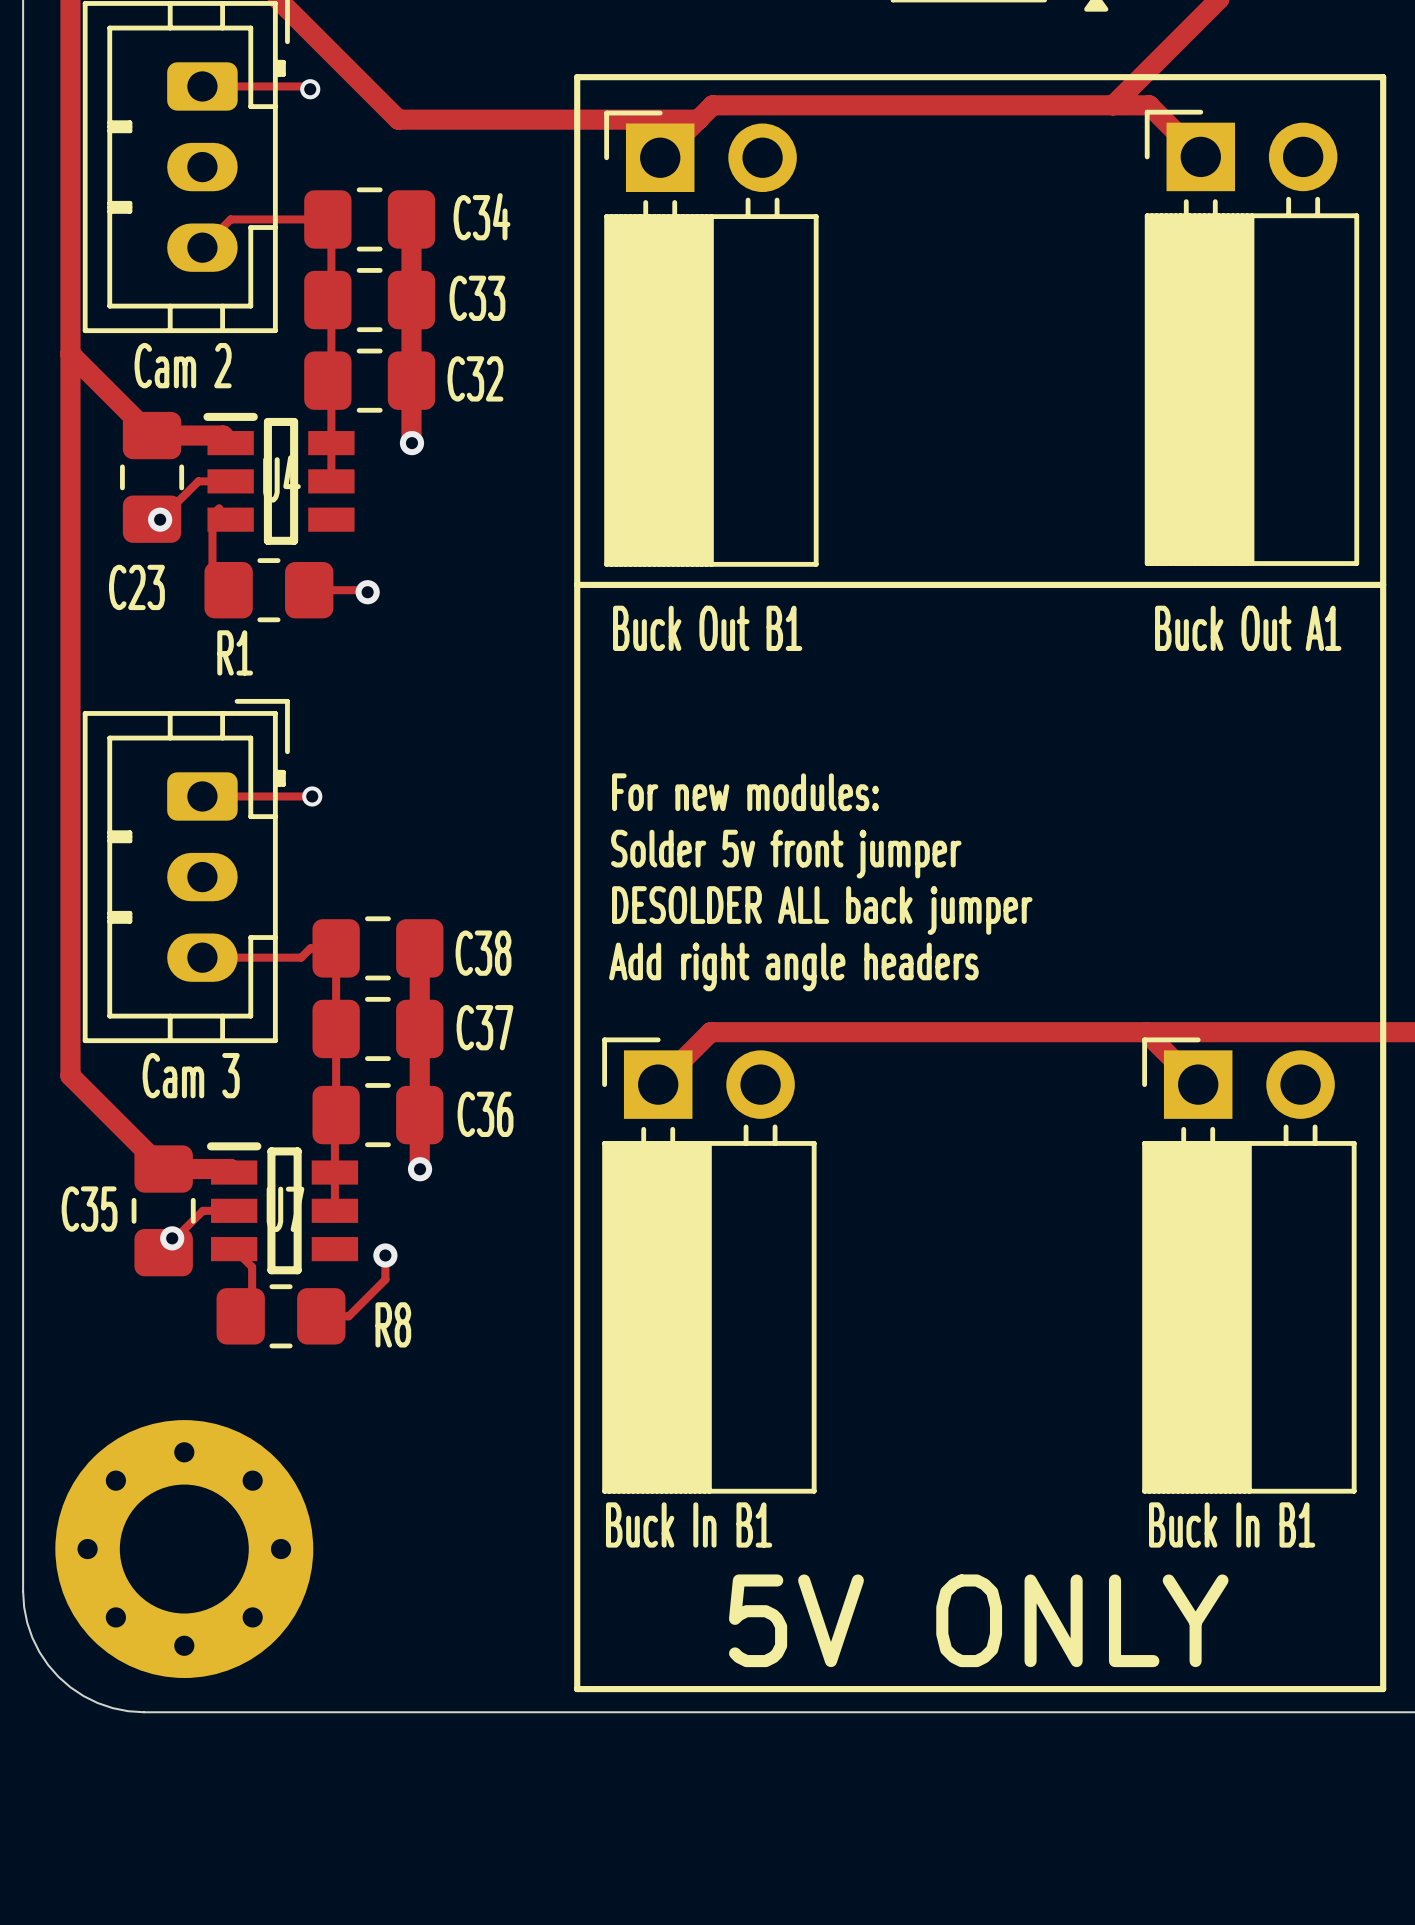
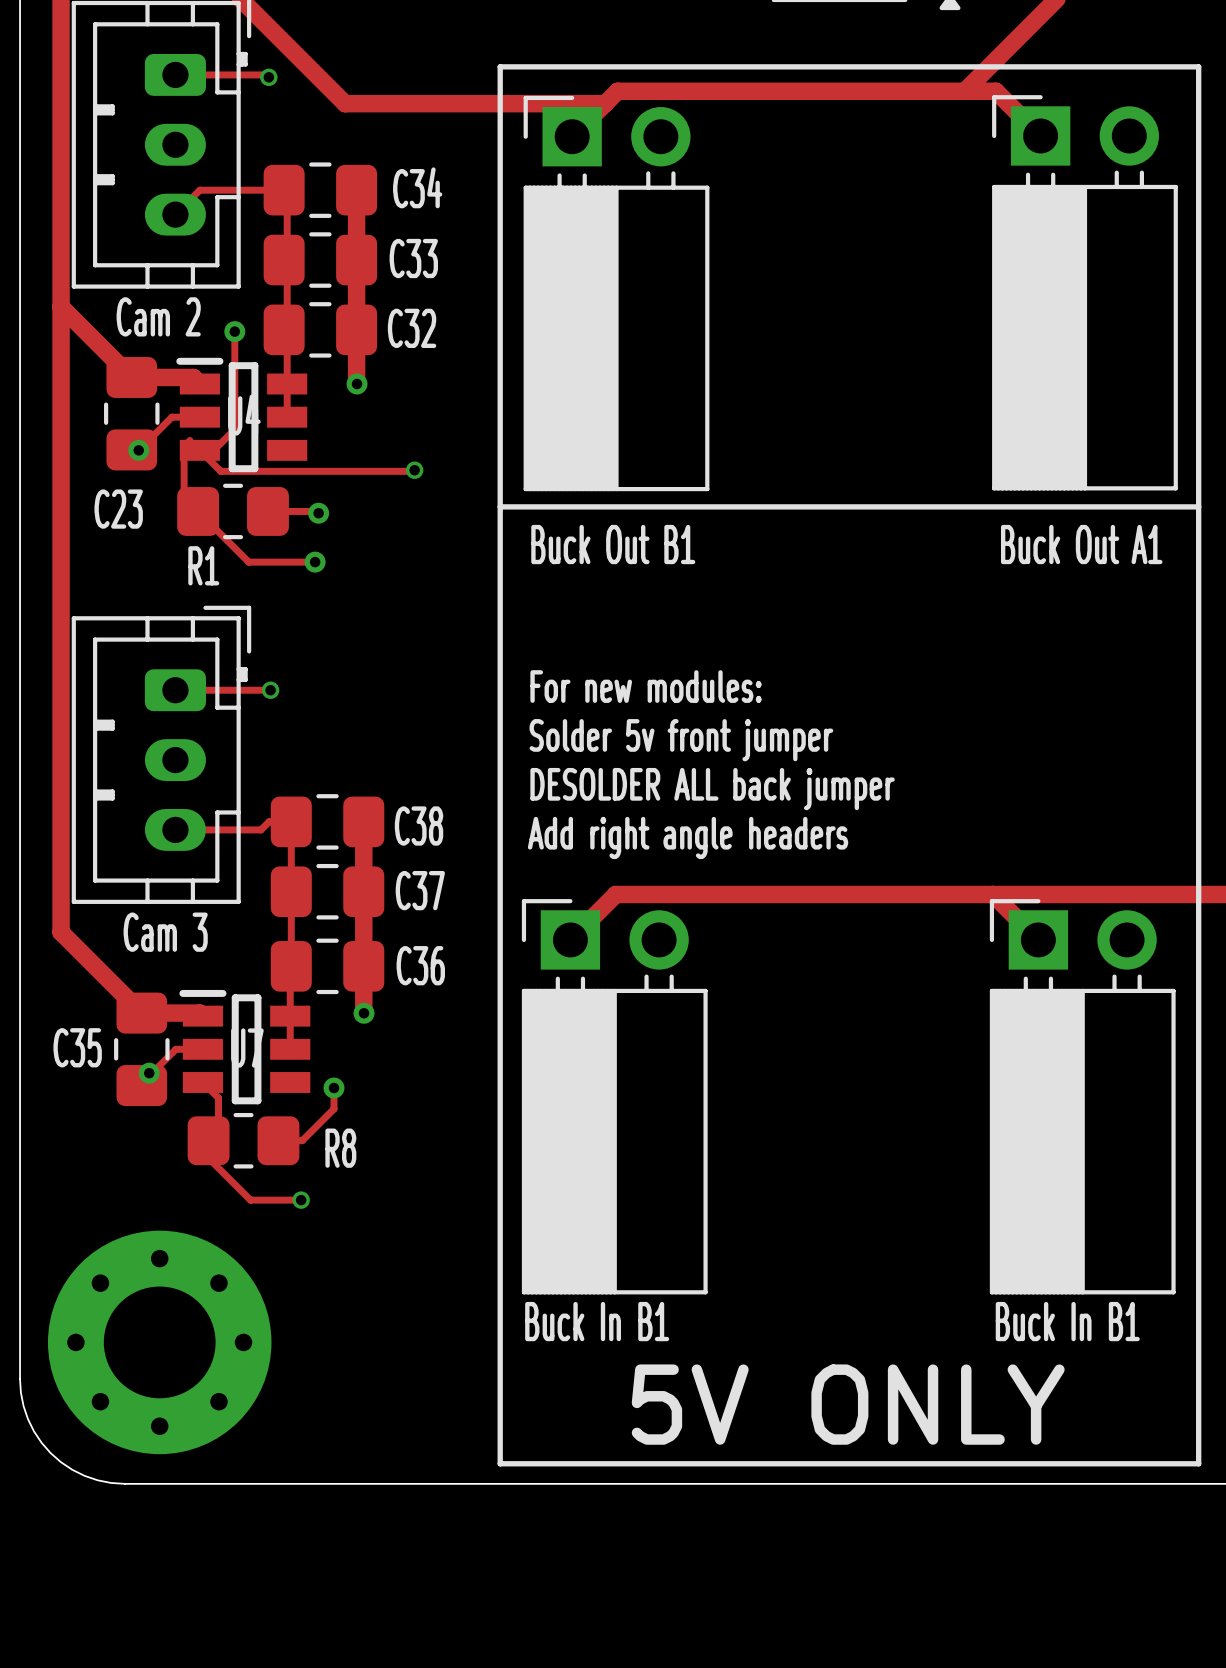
track: none -> (234, 331) (234, 429) (213, 450) (199, 450)
via: none -> (234, 331)
track: none -> (199, 450) (220, 471) (414, 470)
via: none -> (414, 470)
track: none -> (185, 520) (189, 520) (198, 511) (248, 562) (315, 562)
via: none -> (315, 562)
track: none -> (202, 1135) (208, 1140) (208, 1158) (250, 1200) (301, 1200)
via: none -> (301, 1200)

